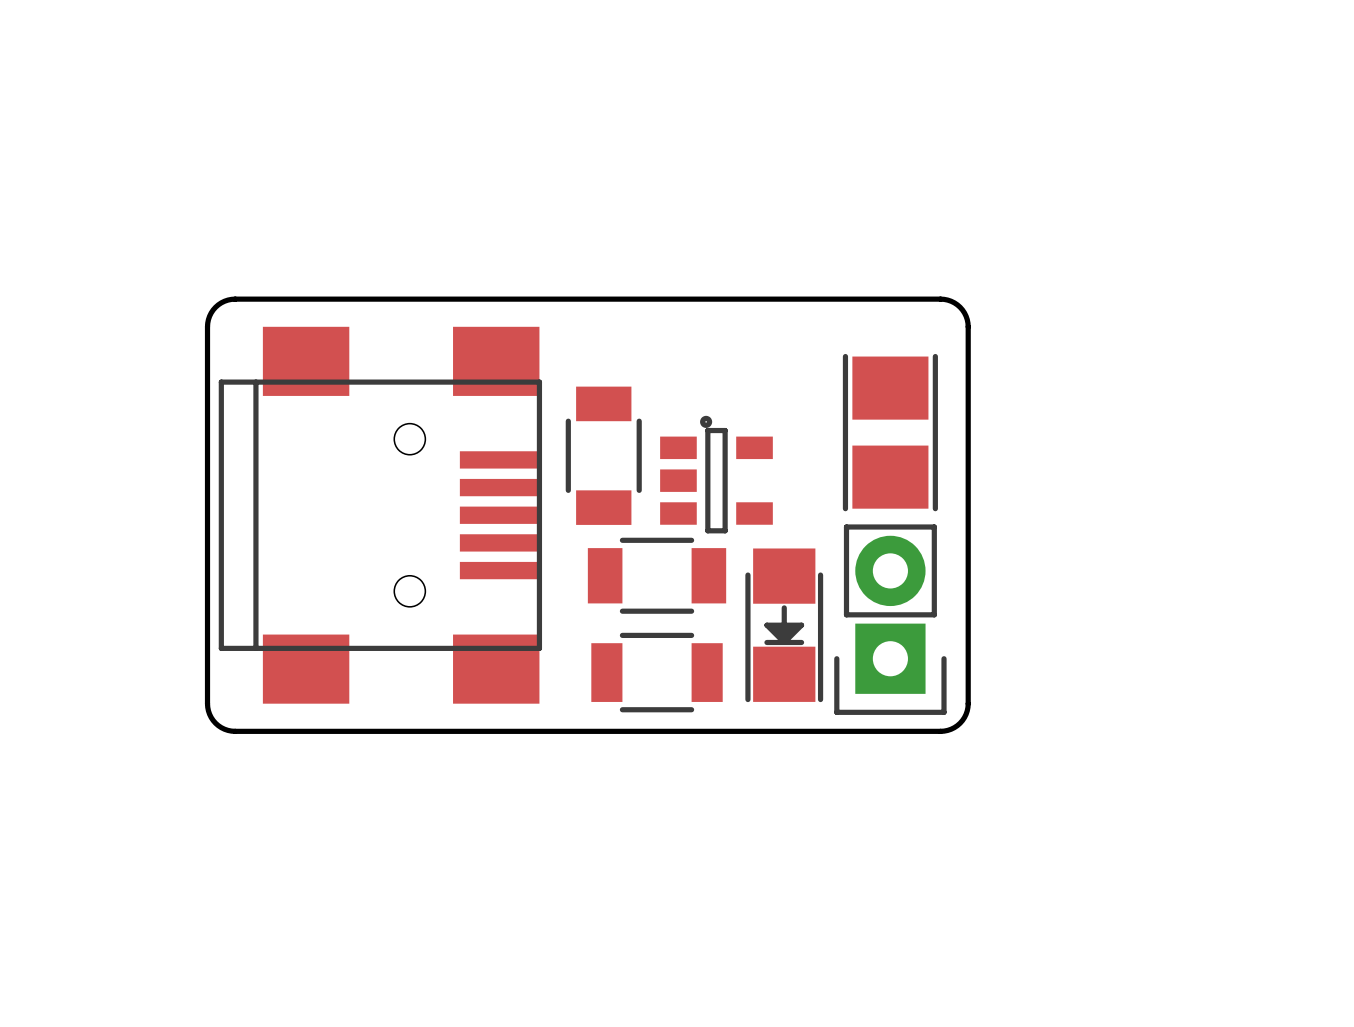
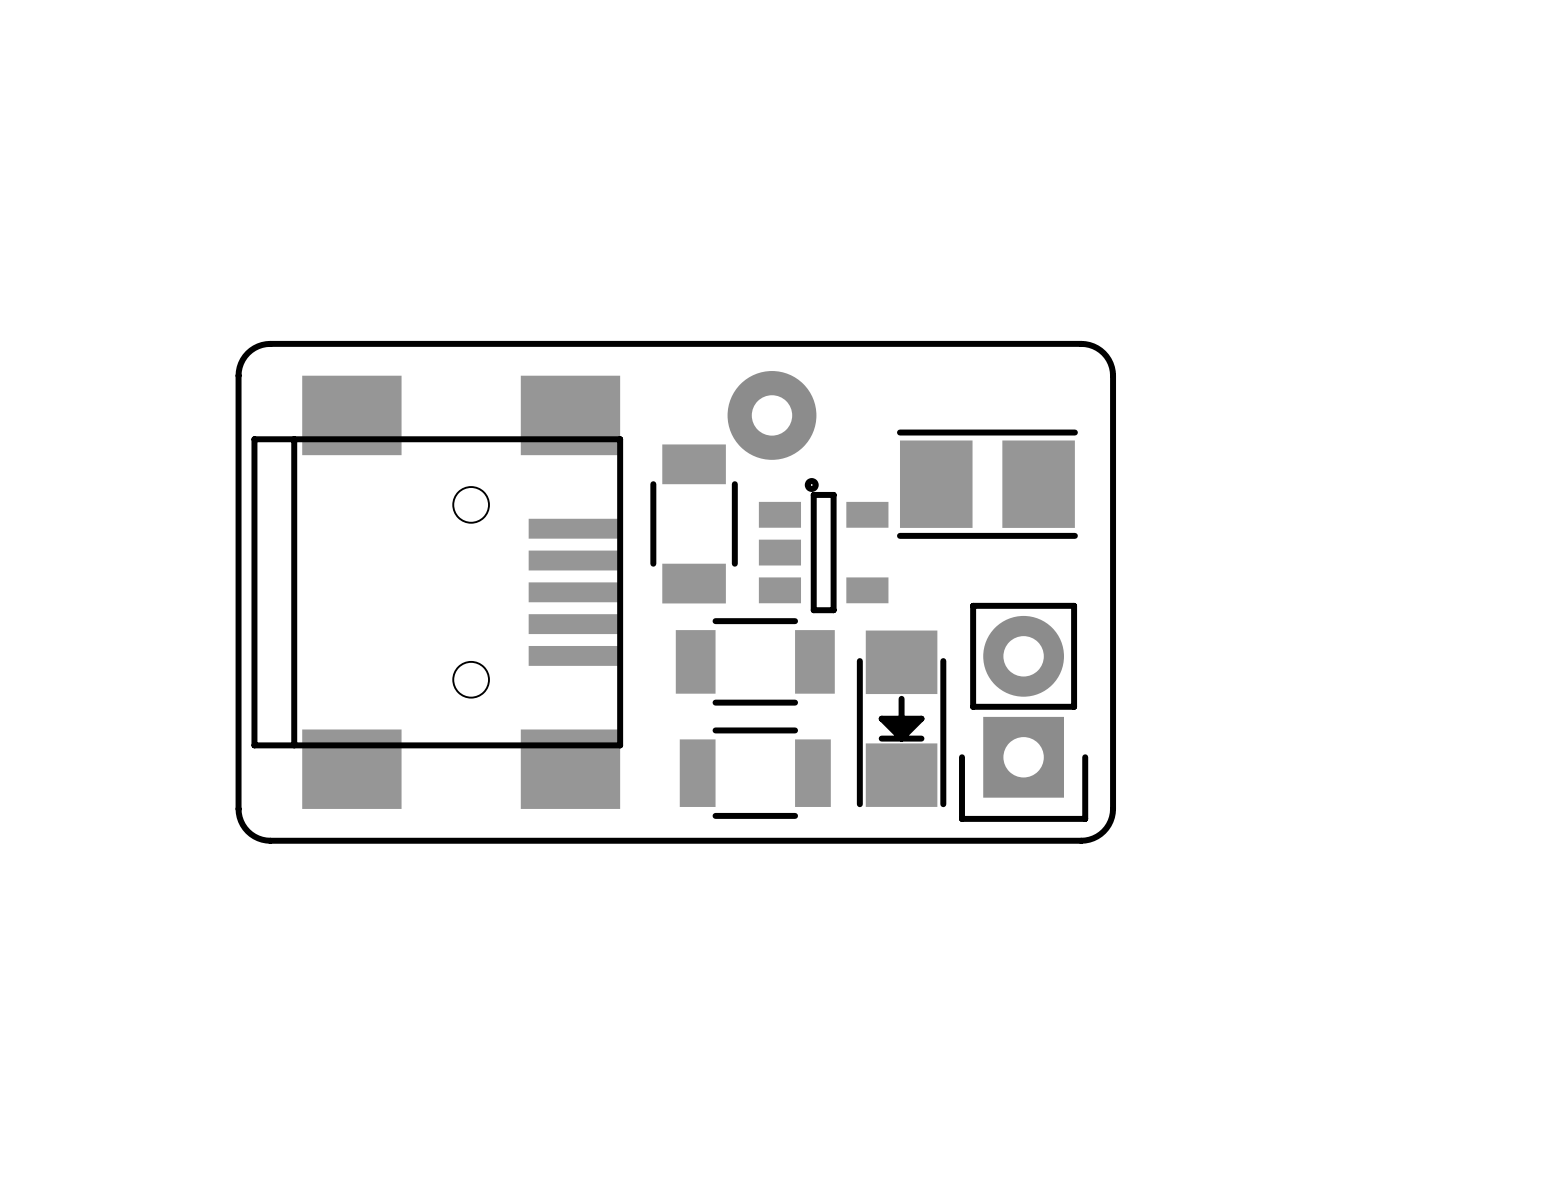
part: none -> (771, 415)
part rotation: 0° (890, 432) -> 90° clockwise (987, 484)

